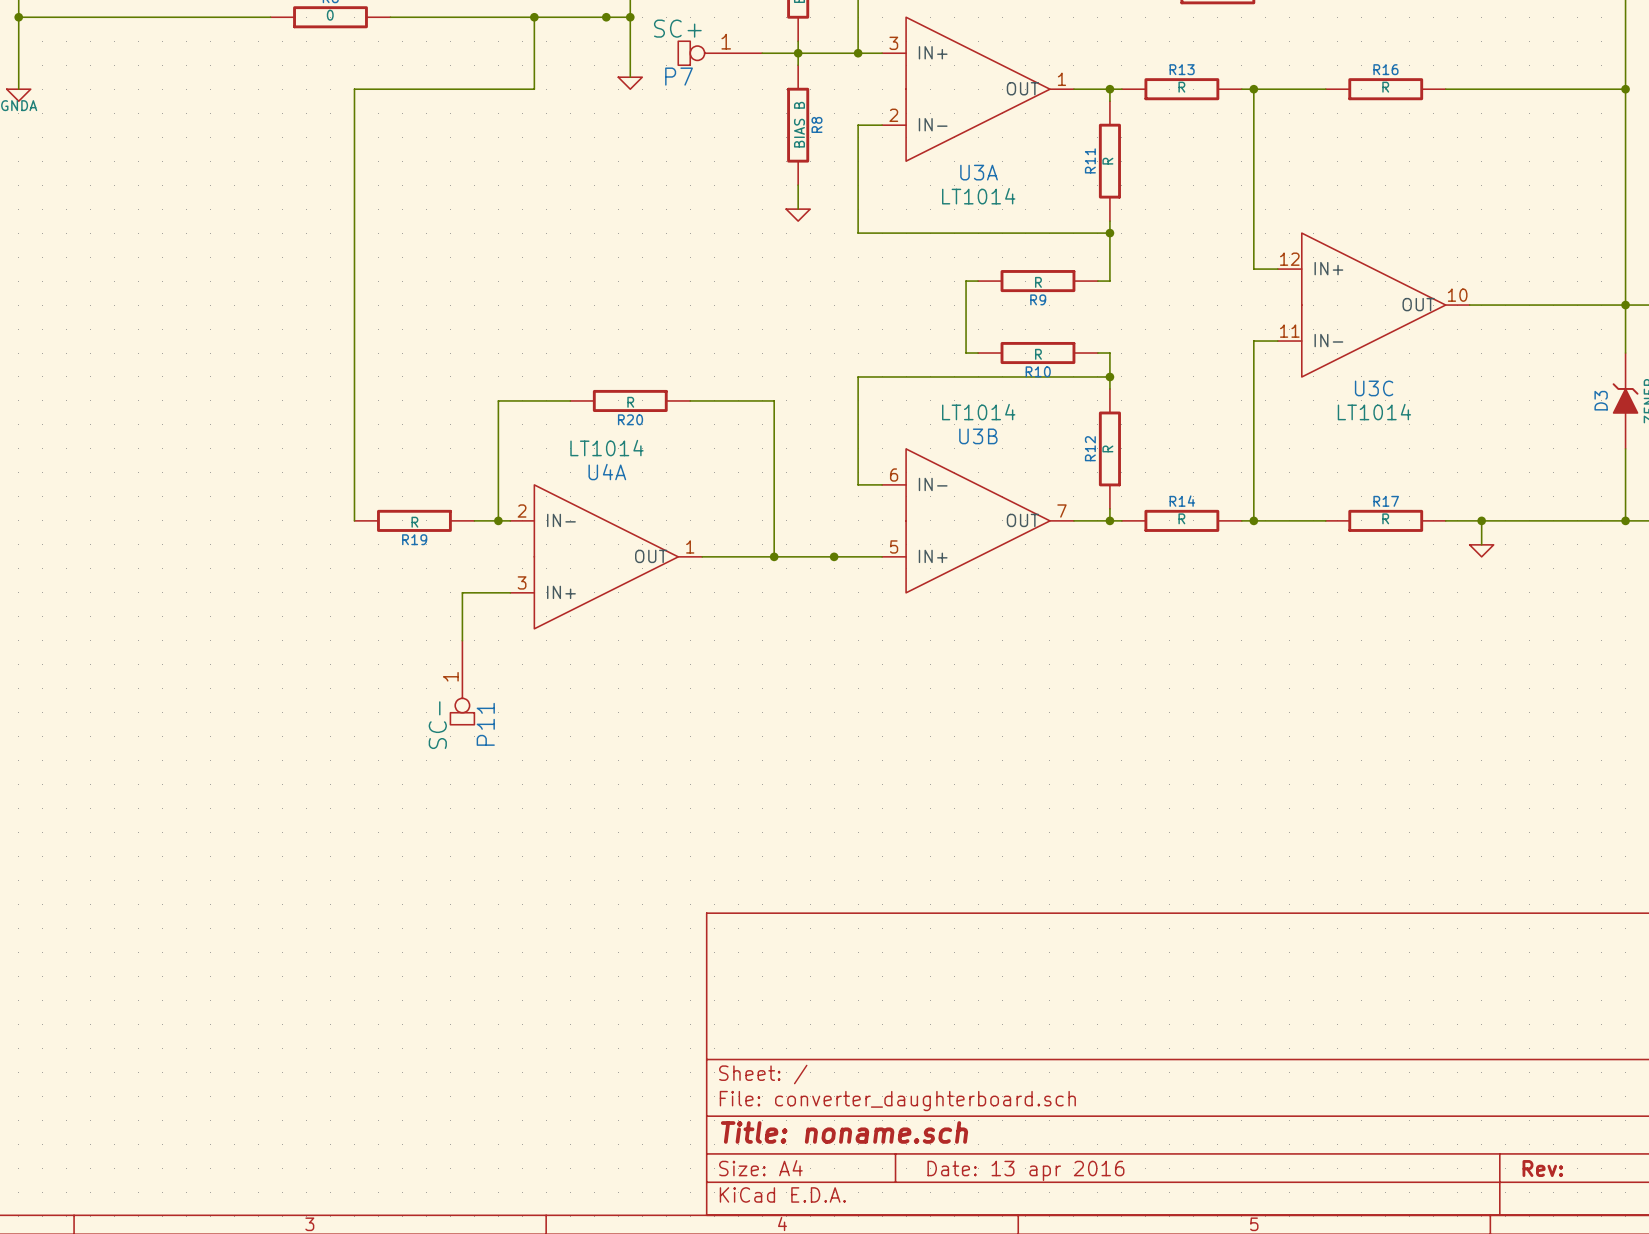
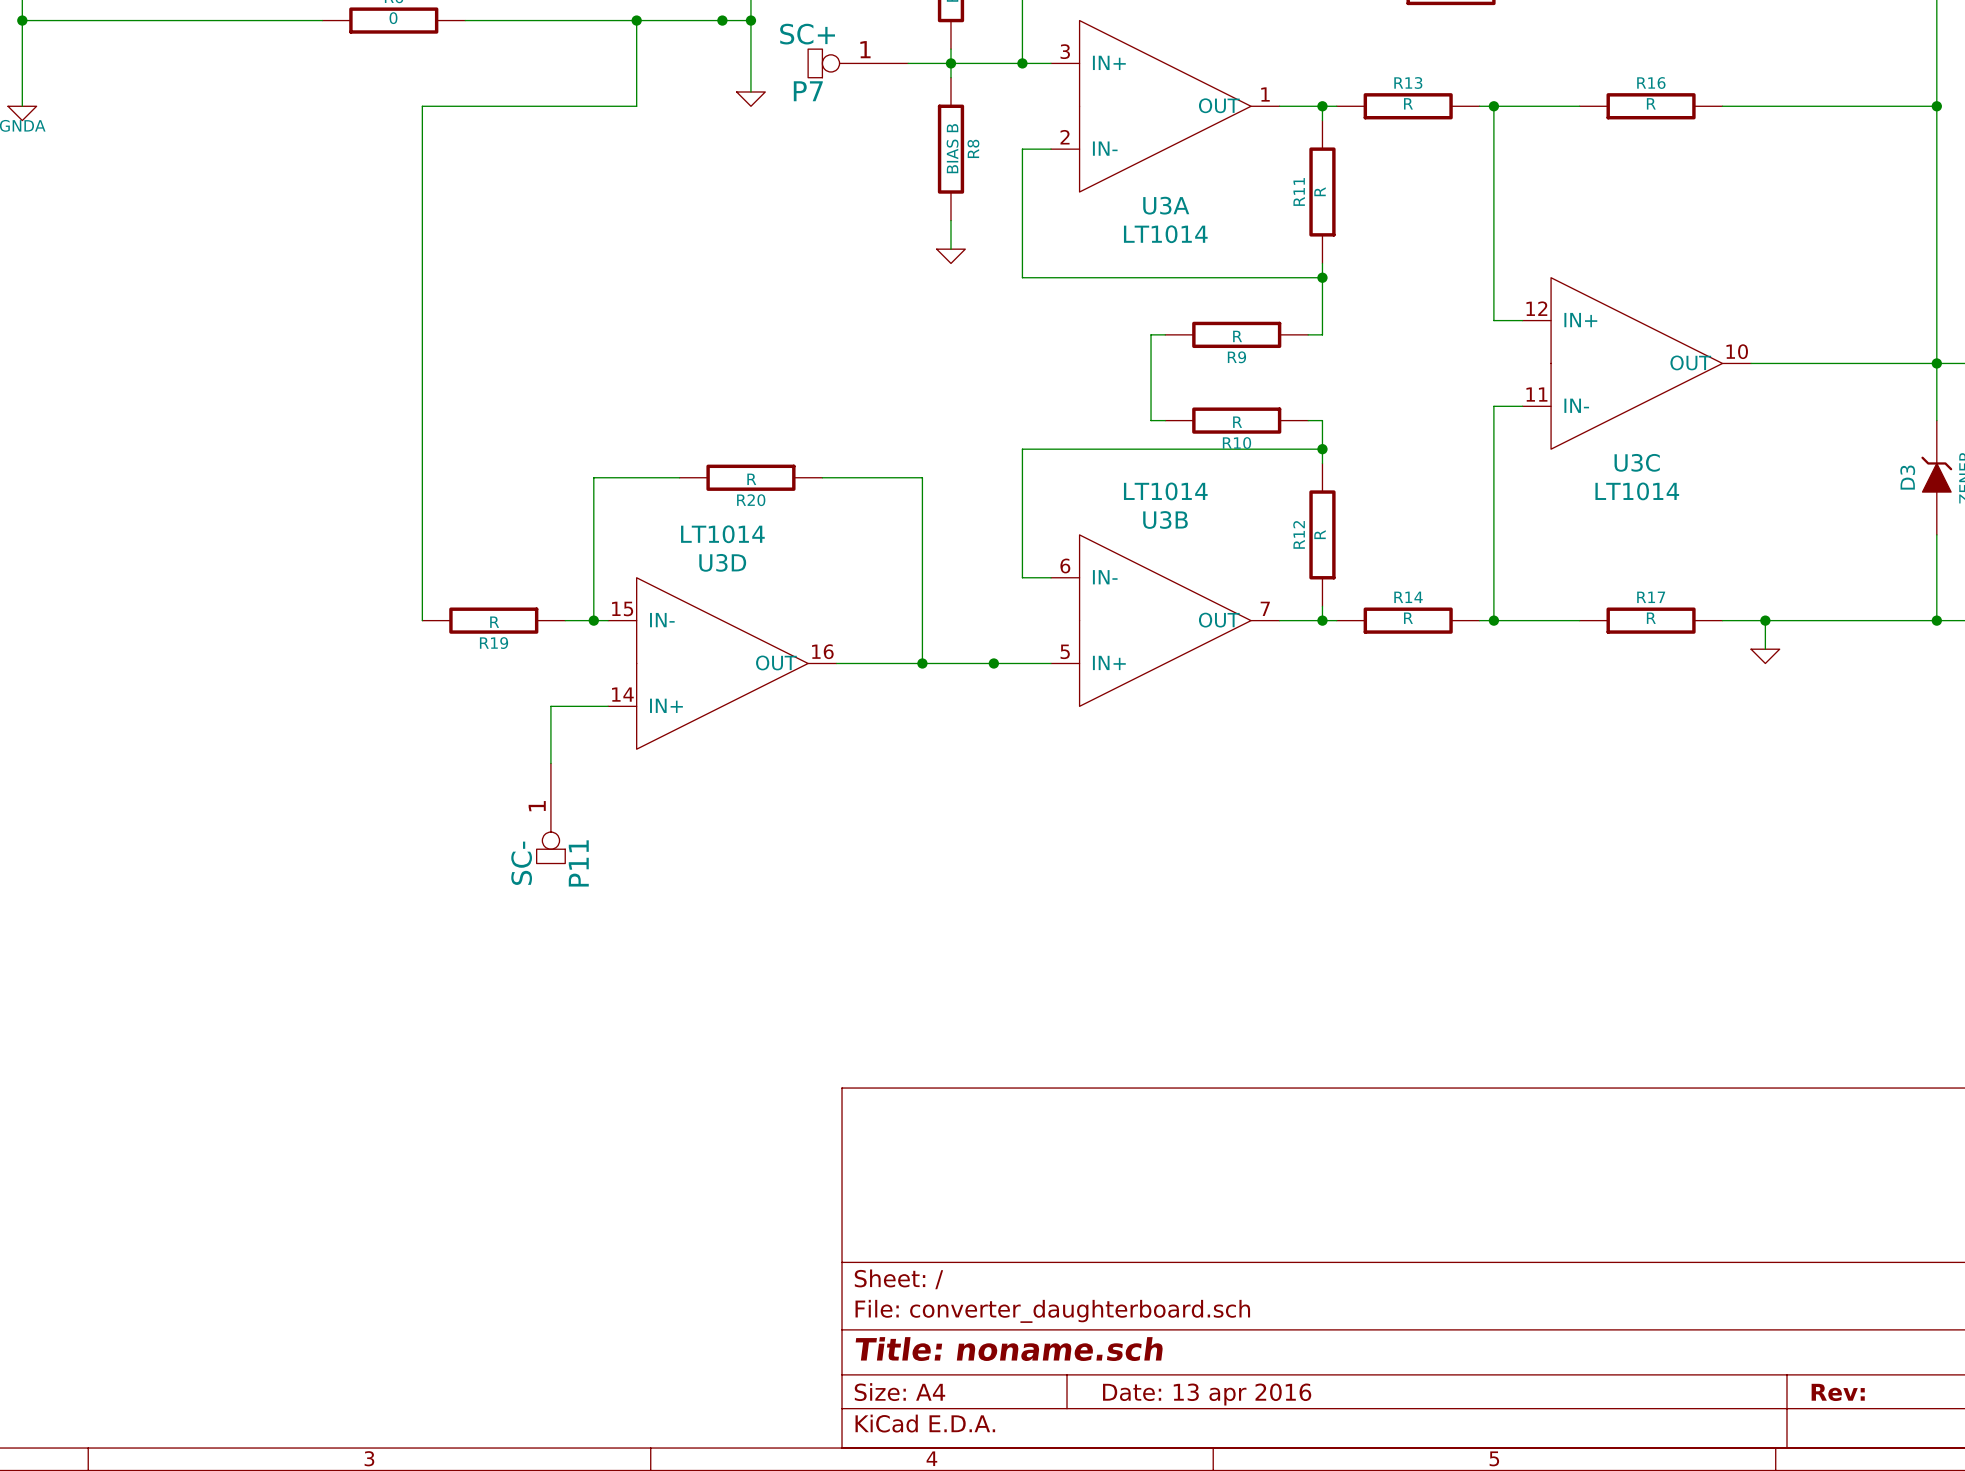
U4A name: U4A (607, 472) -> U3D (722, 562)
U4A pin number: 2 (522, 510) -> 15 (622, 608)
U4A pin number: 1 (690, 546) -> 16 (822, 651)
U4A pin number: 3 (522, 582) -> 14 (622, 694)

